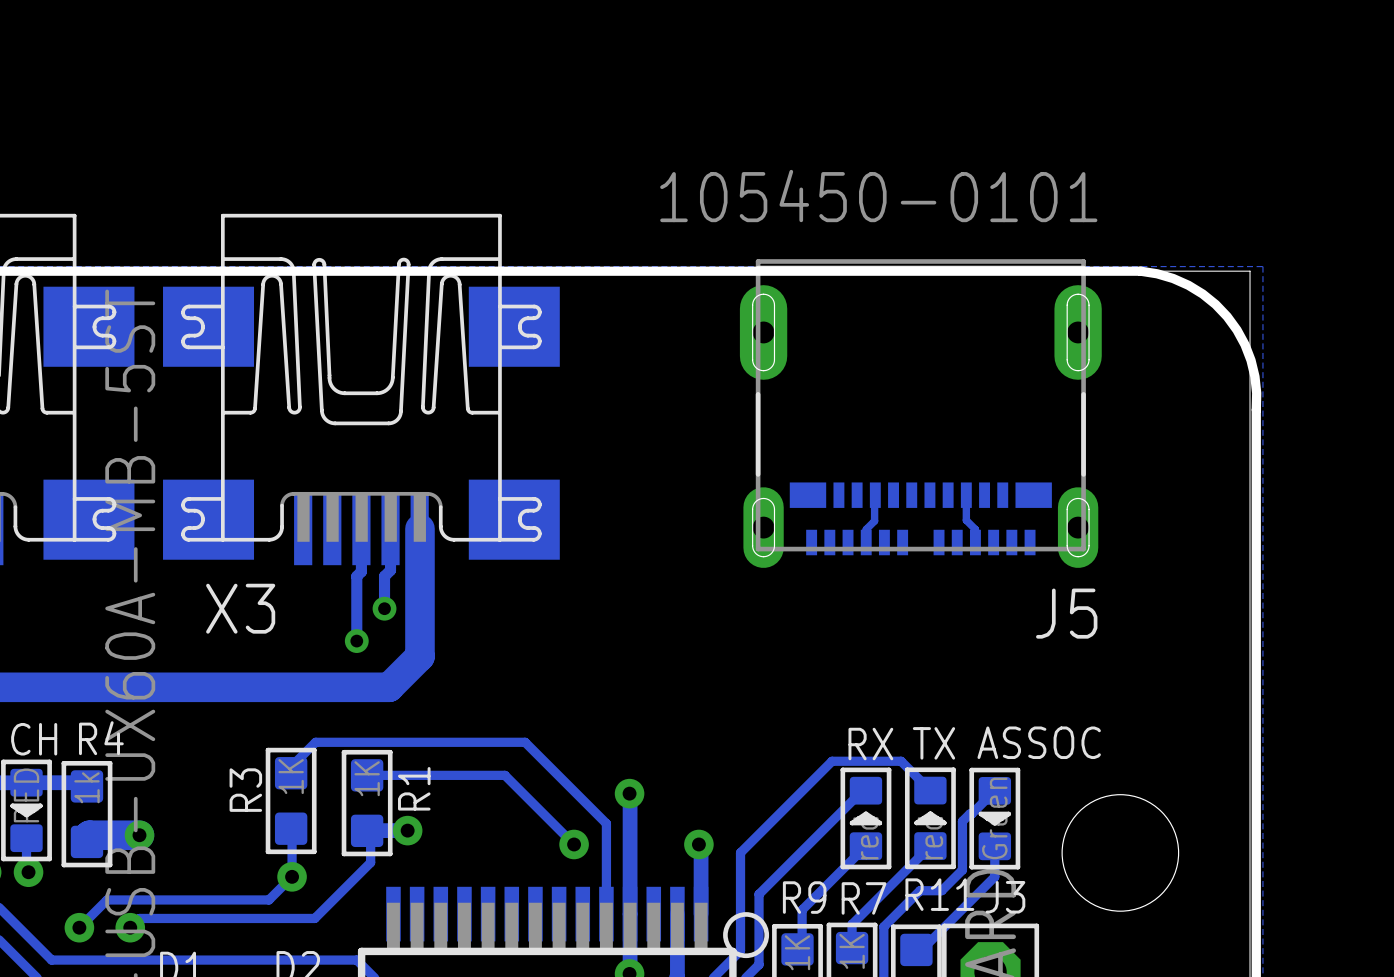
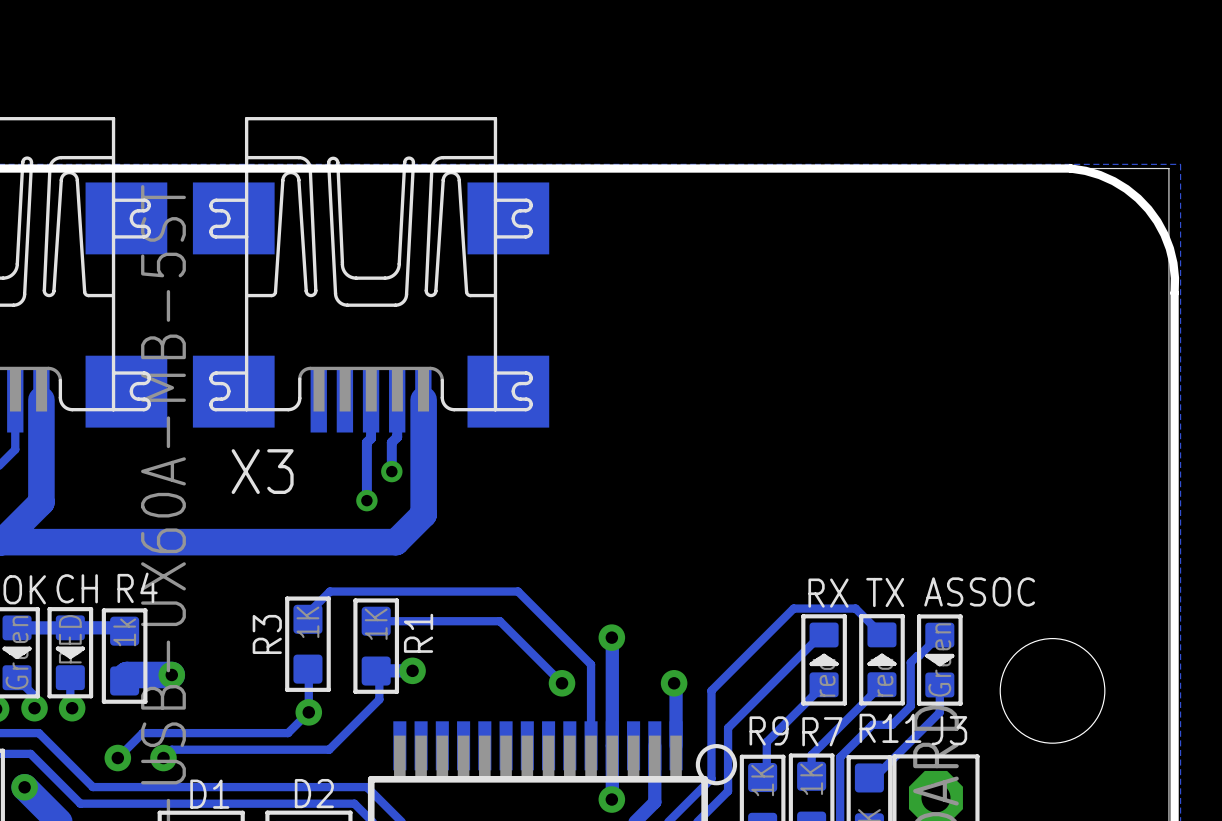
J5: 105450-0101 (920, 413) -> none
track: (875, 495) (874, 521) (866, 529) (866, 542) -> none
track: (966, 495) (966, 520) (975, 529) (975, 542) -> none

